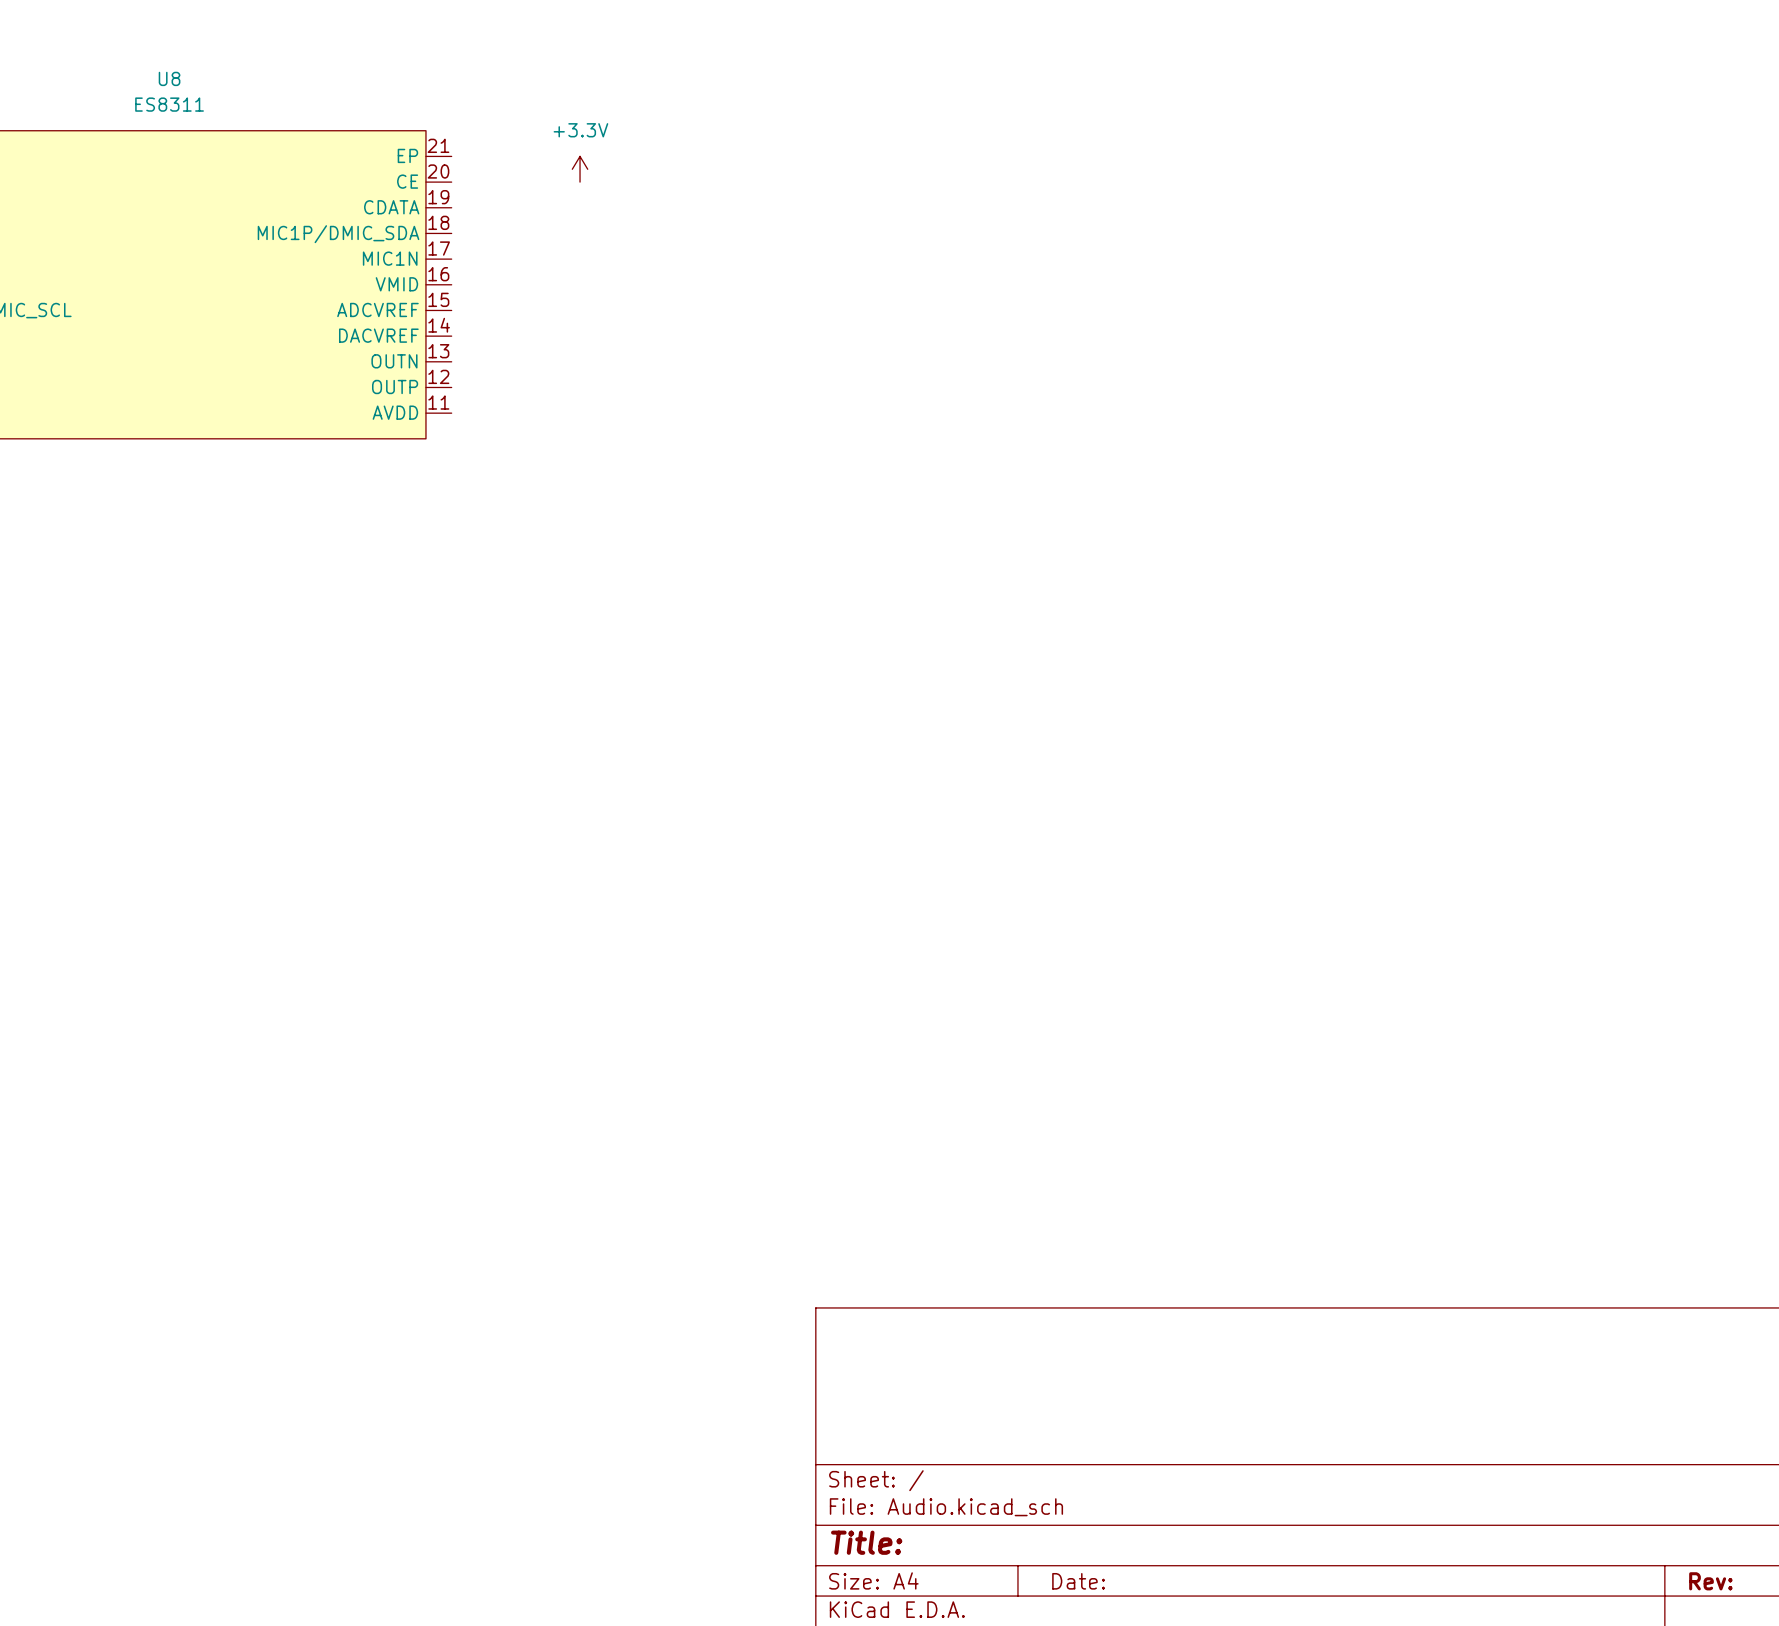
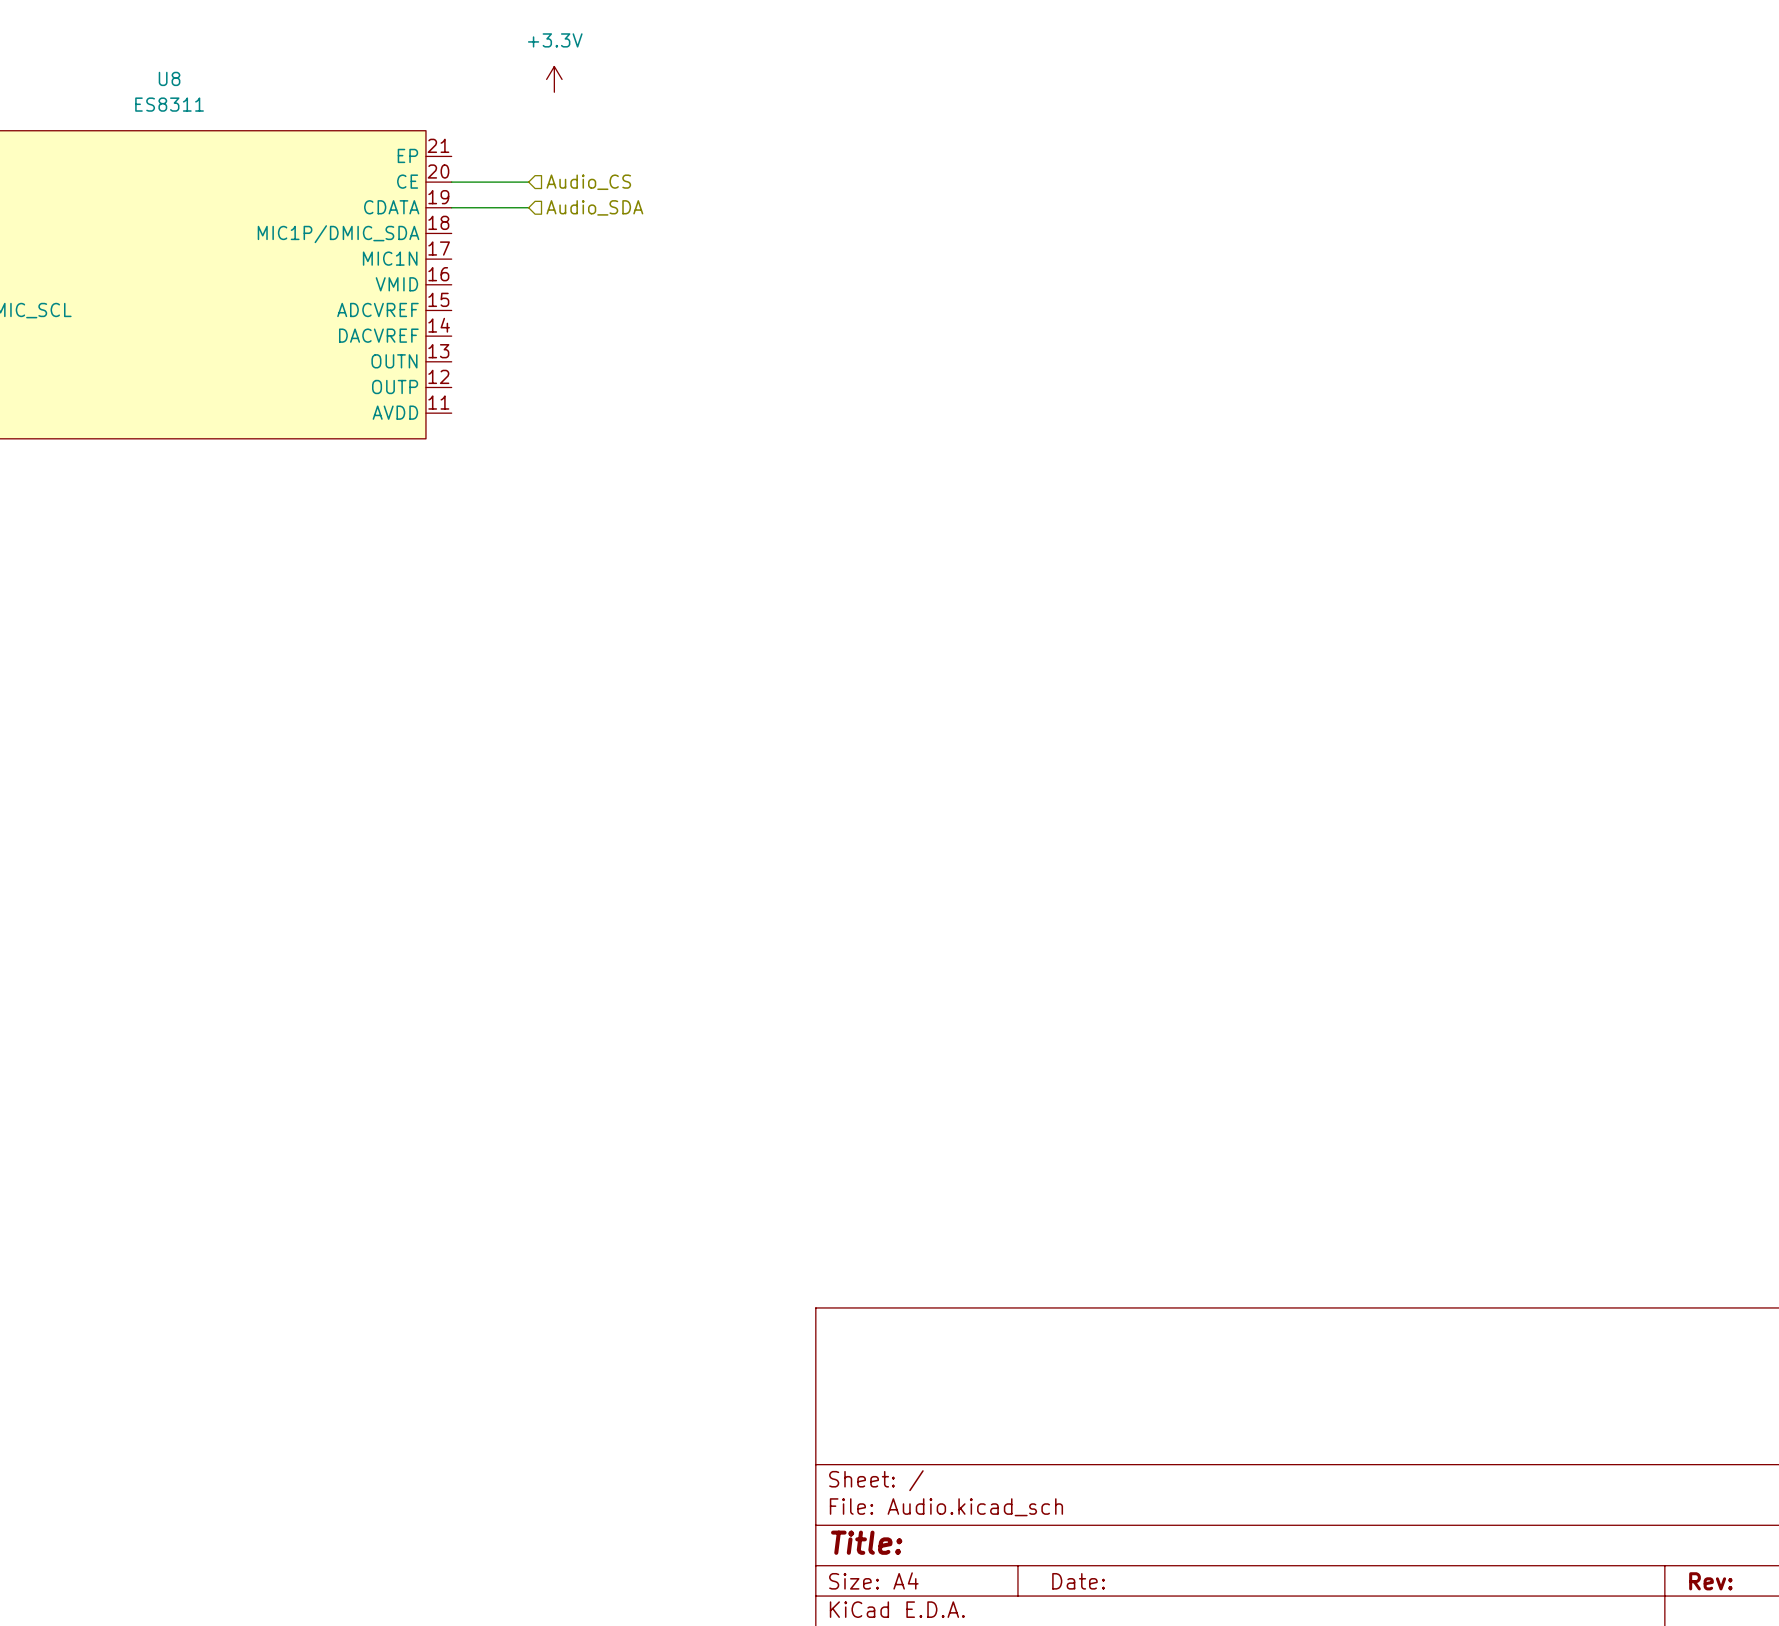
power symbol position: +3.3V (580, 169) -> +3.3V (554, 79)
wire: none -> (451, 182) (528, 182)
hierarchical label: none -> Audio_CS (588, 182)
wire: none -> (451, 207) (528, 207)
hierarchical label: none -> Audio_SDA (594, 207)

